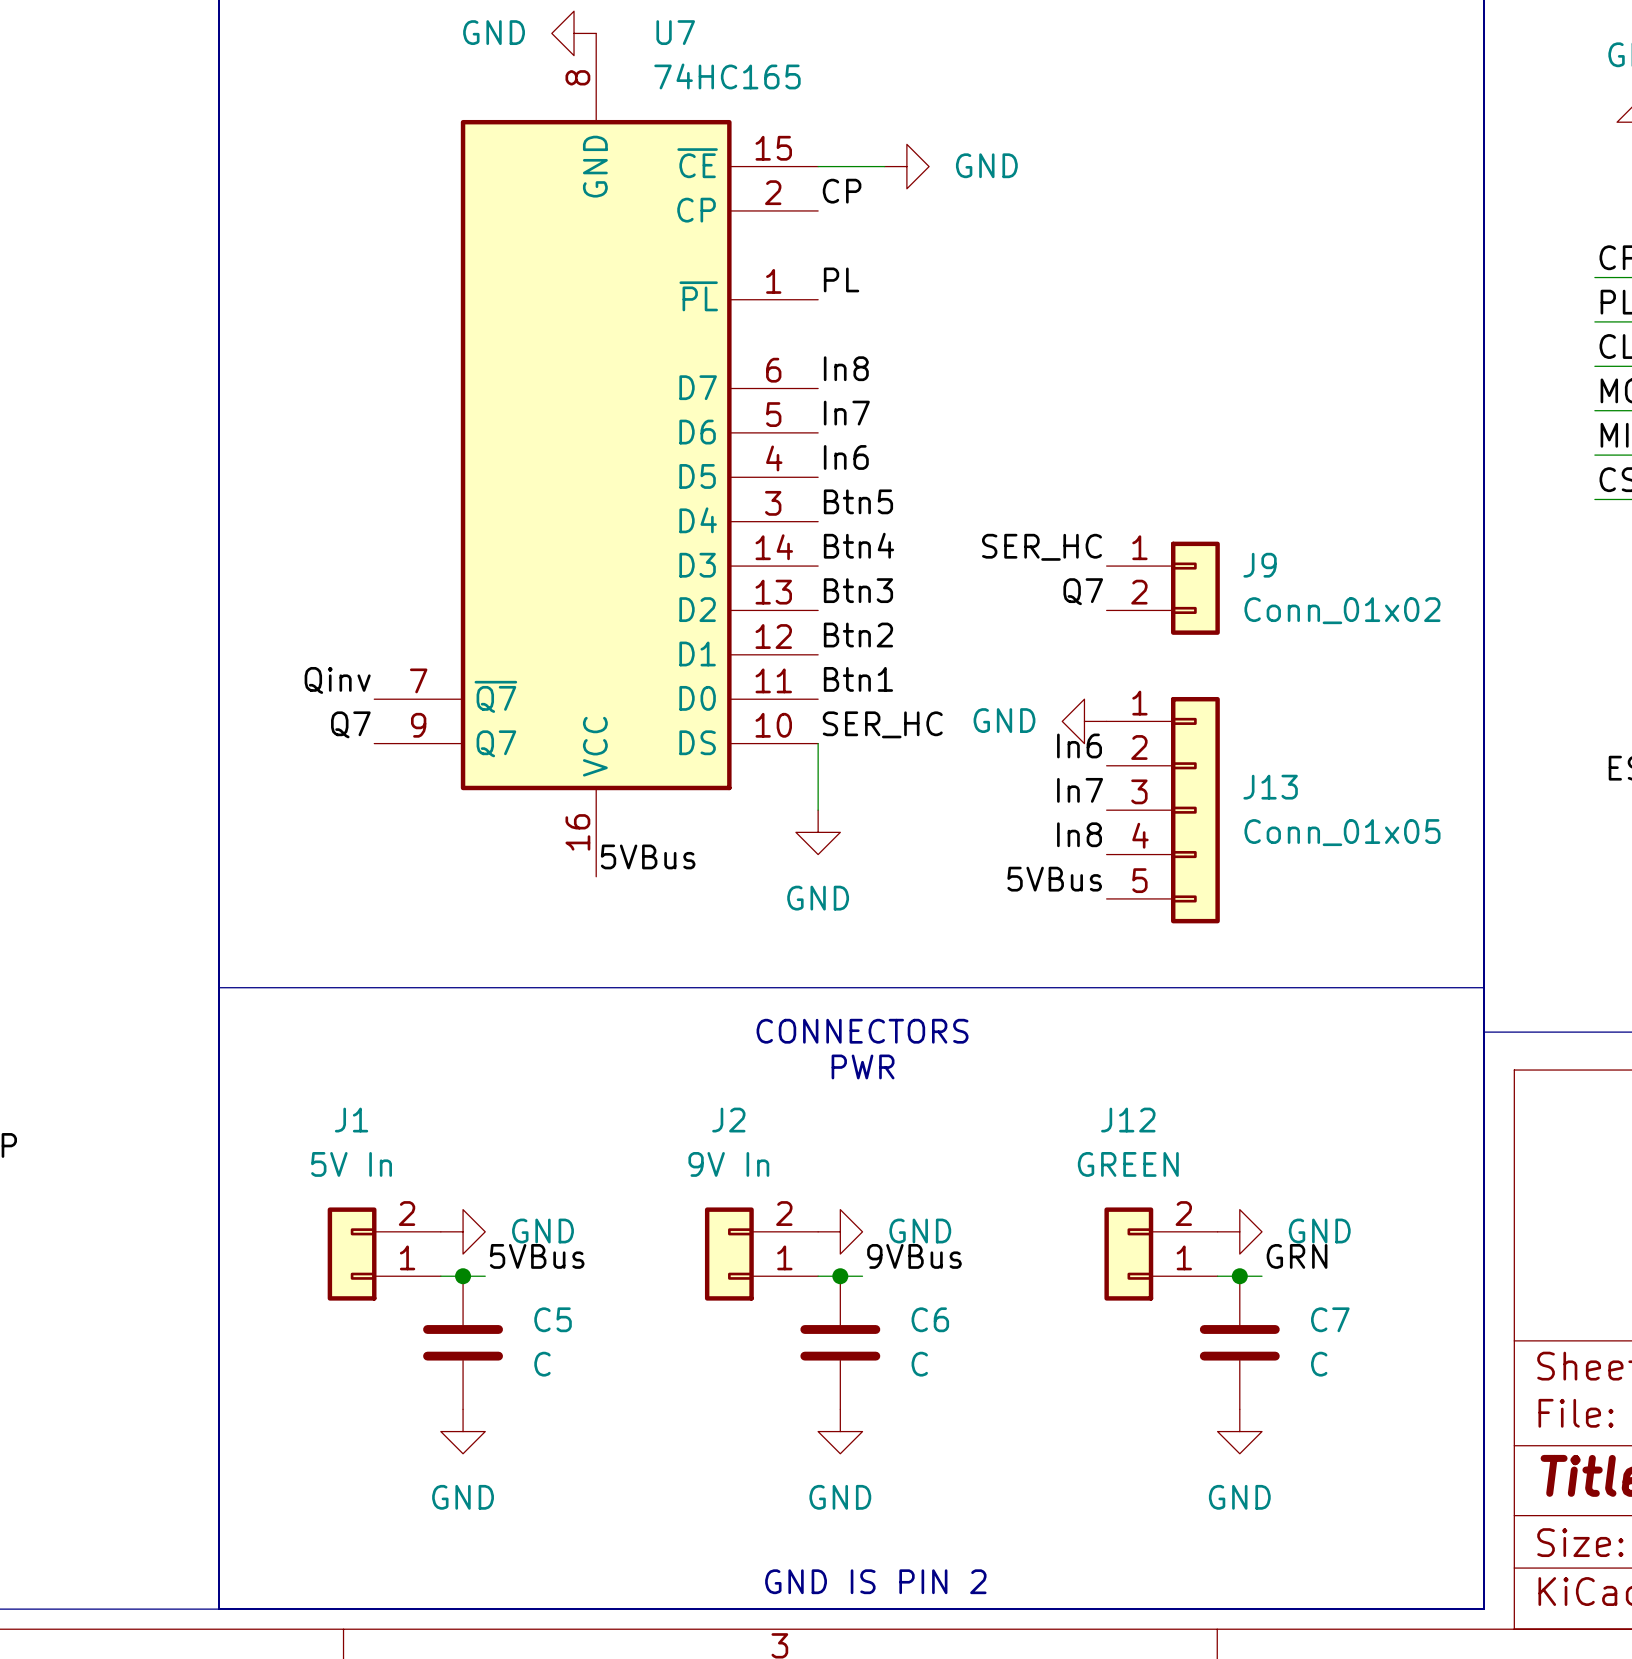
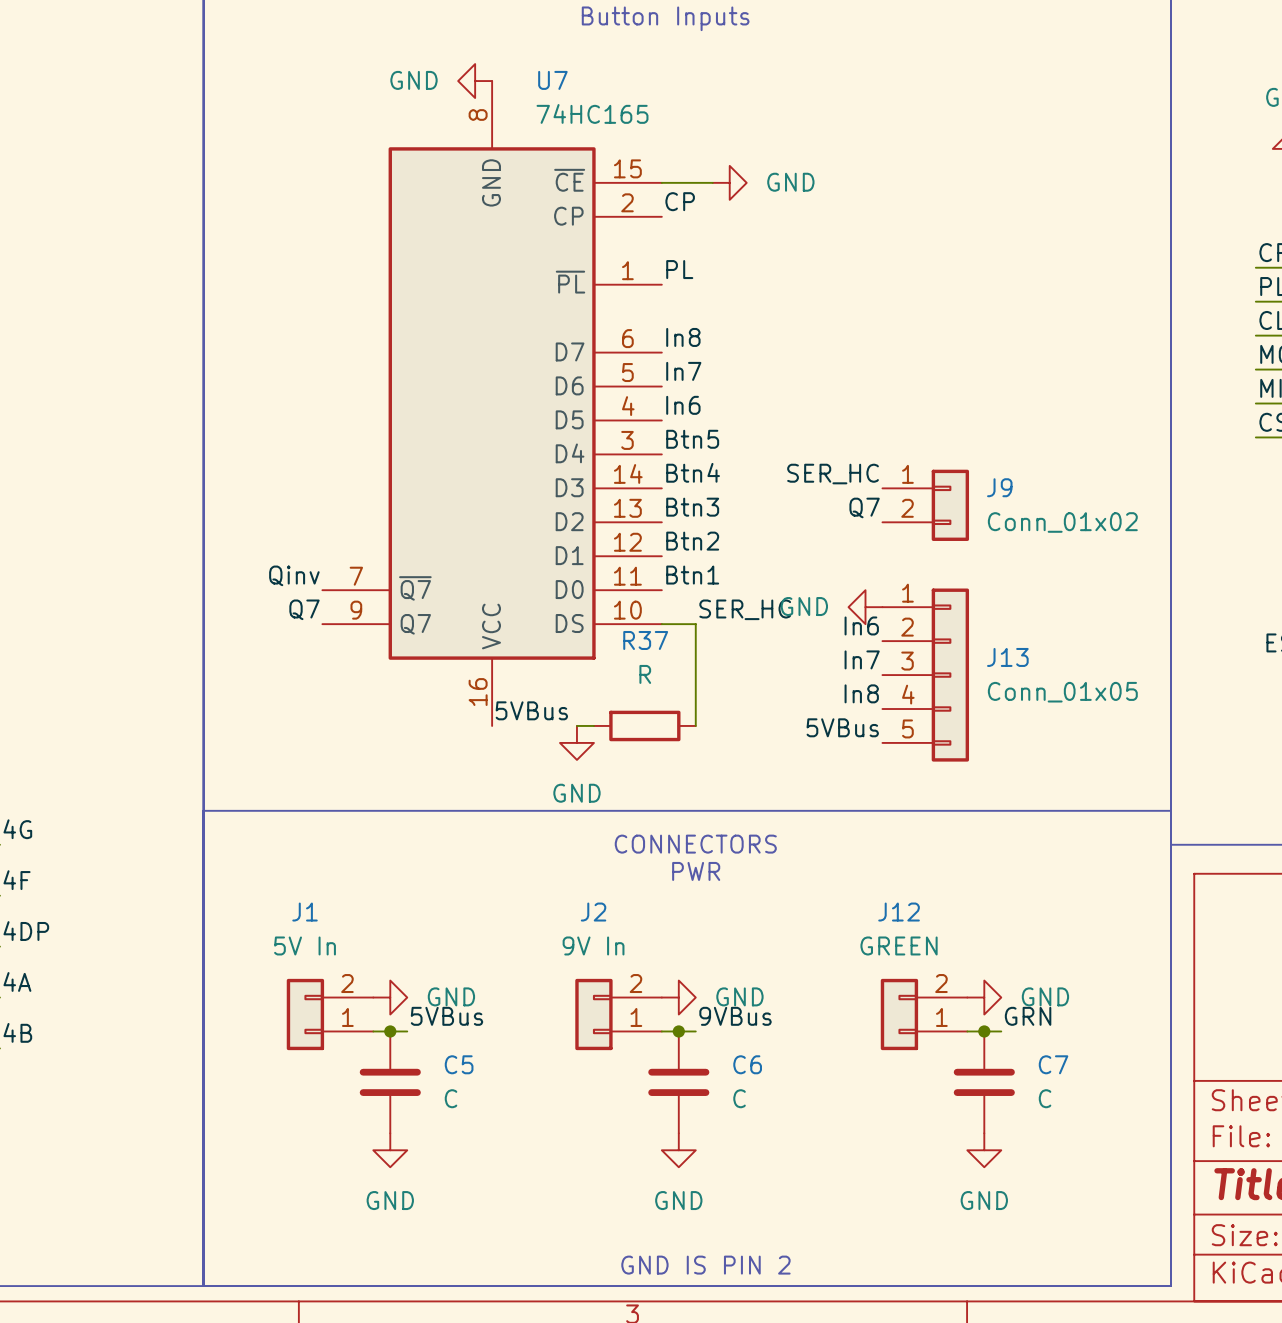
label position: SER_HC (882, 724) -> SER_HC (745, 609)
wire: (818, 743) (818, 810) -> (661, 624) (695, 624) (695, 725)
power symbol position: GND (818, 832) -> GND (576, 742)
wire: none -> (576, 725) (593, 725)
R37: none -> R (644, 725)

